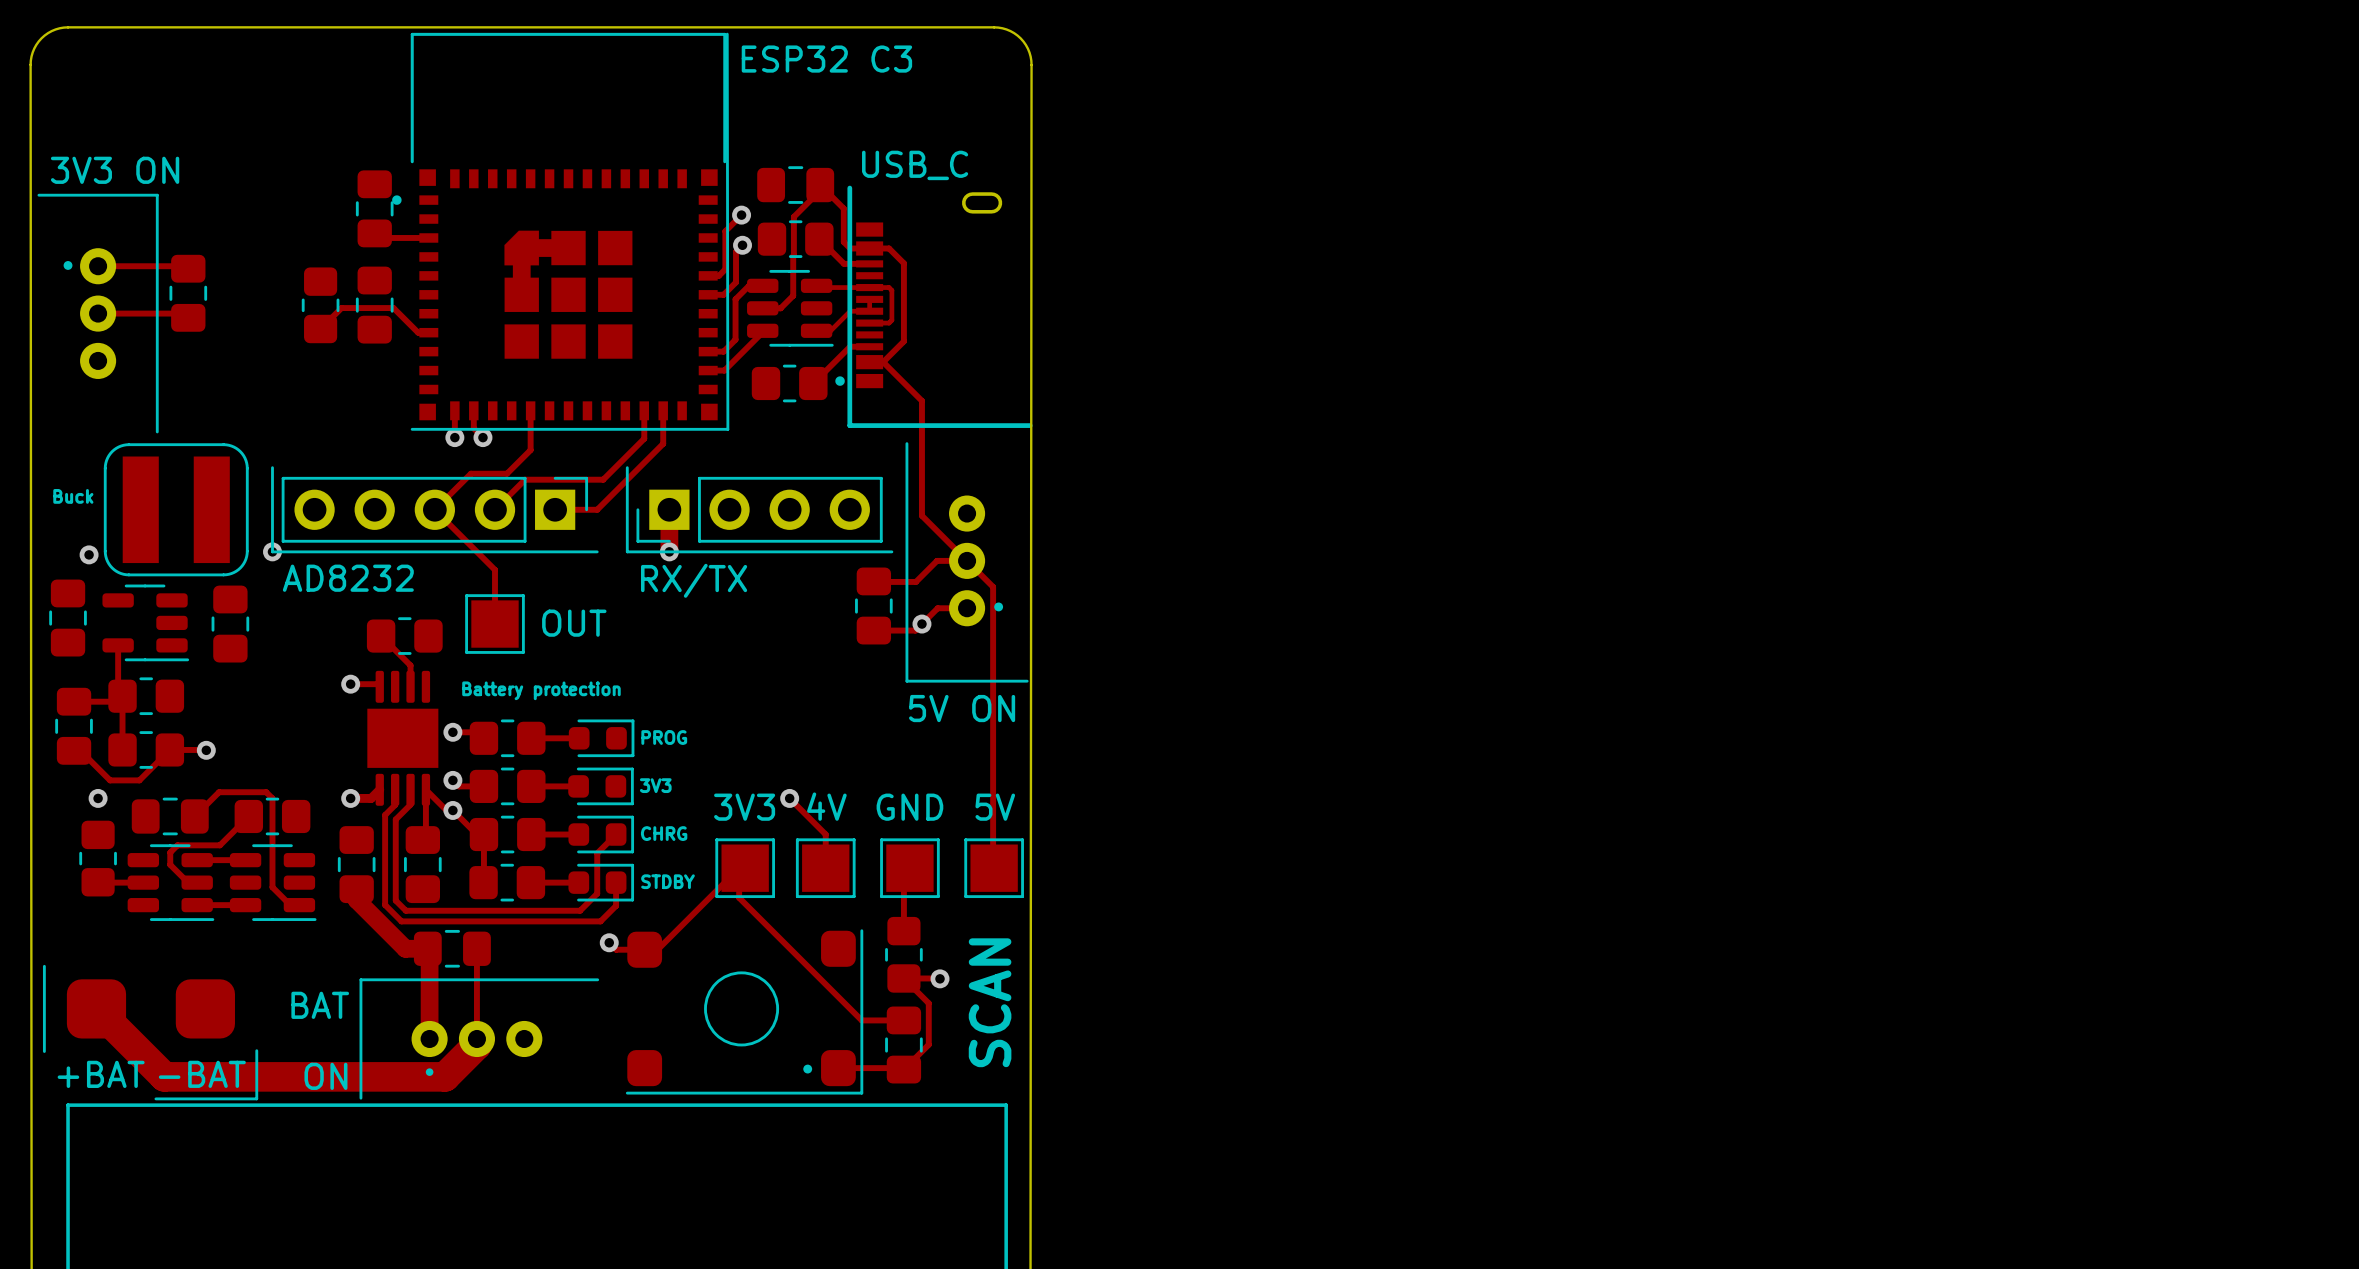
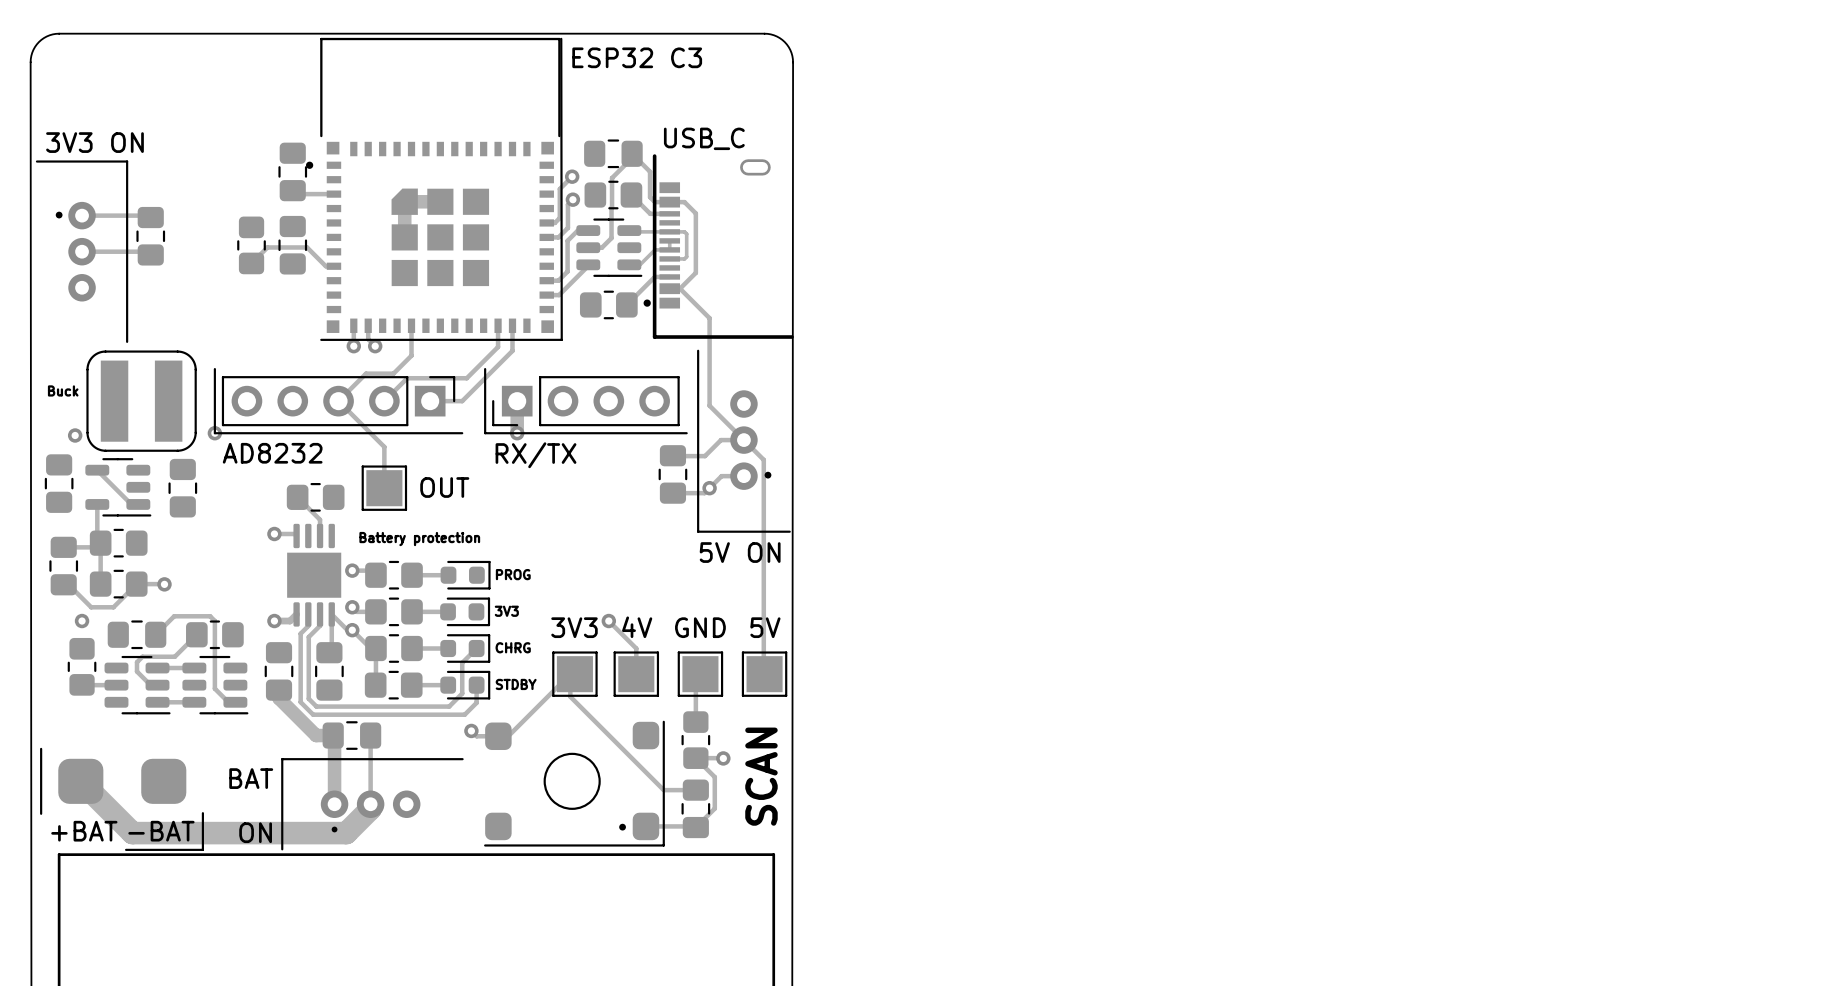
track: none -> (97, 470) (131, 504) (138, 504)

